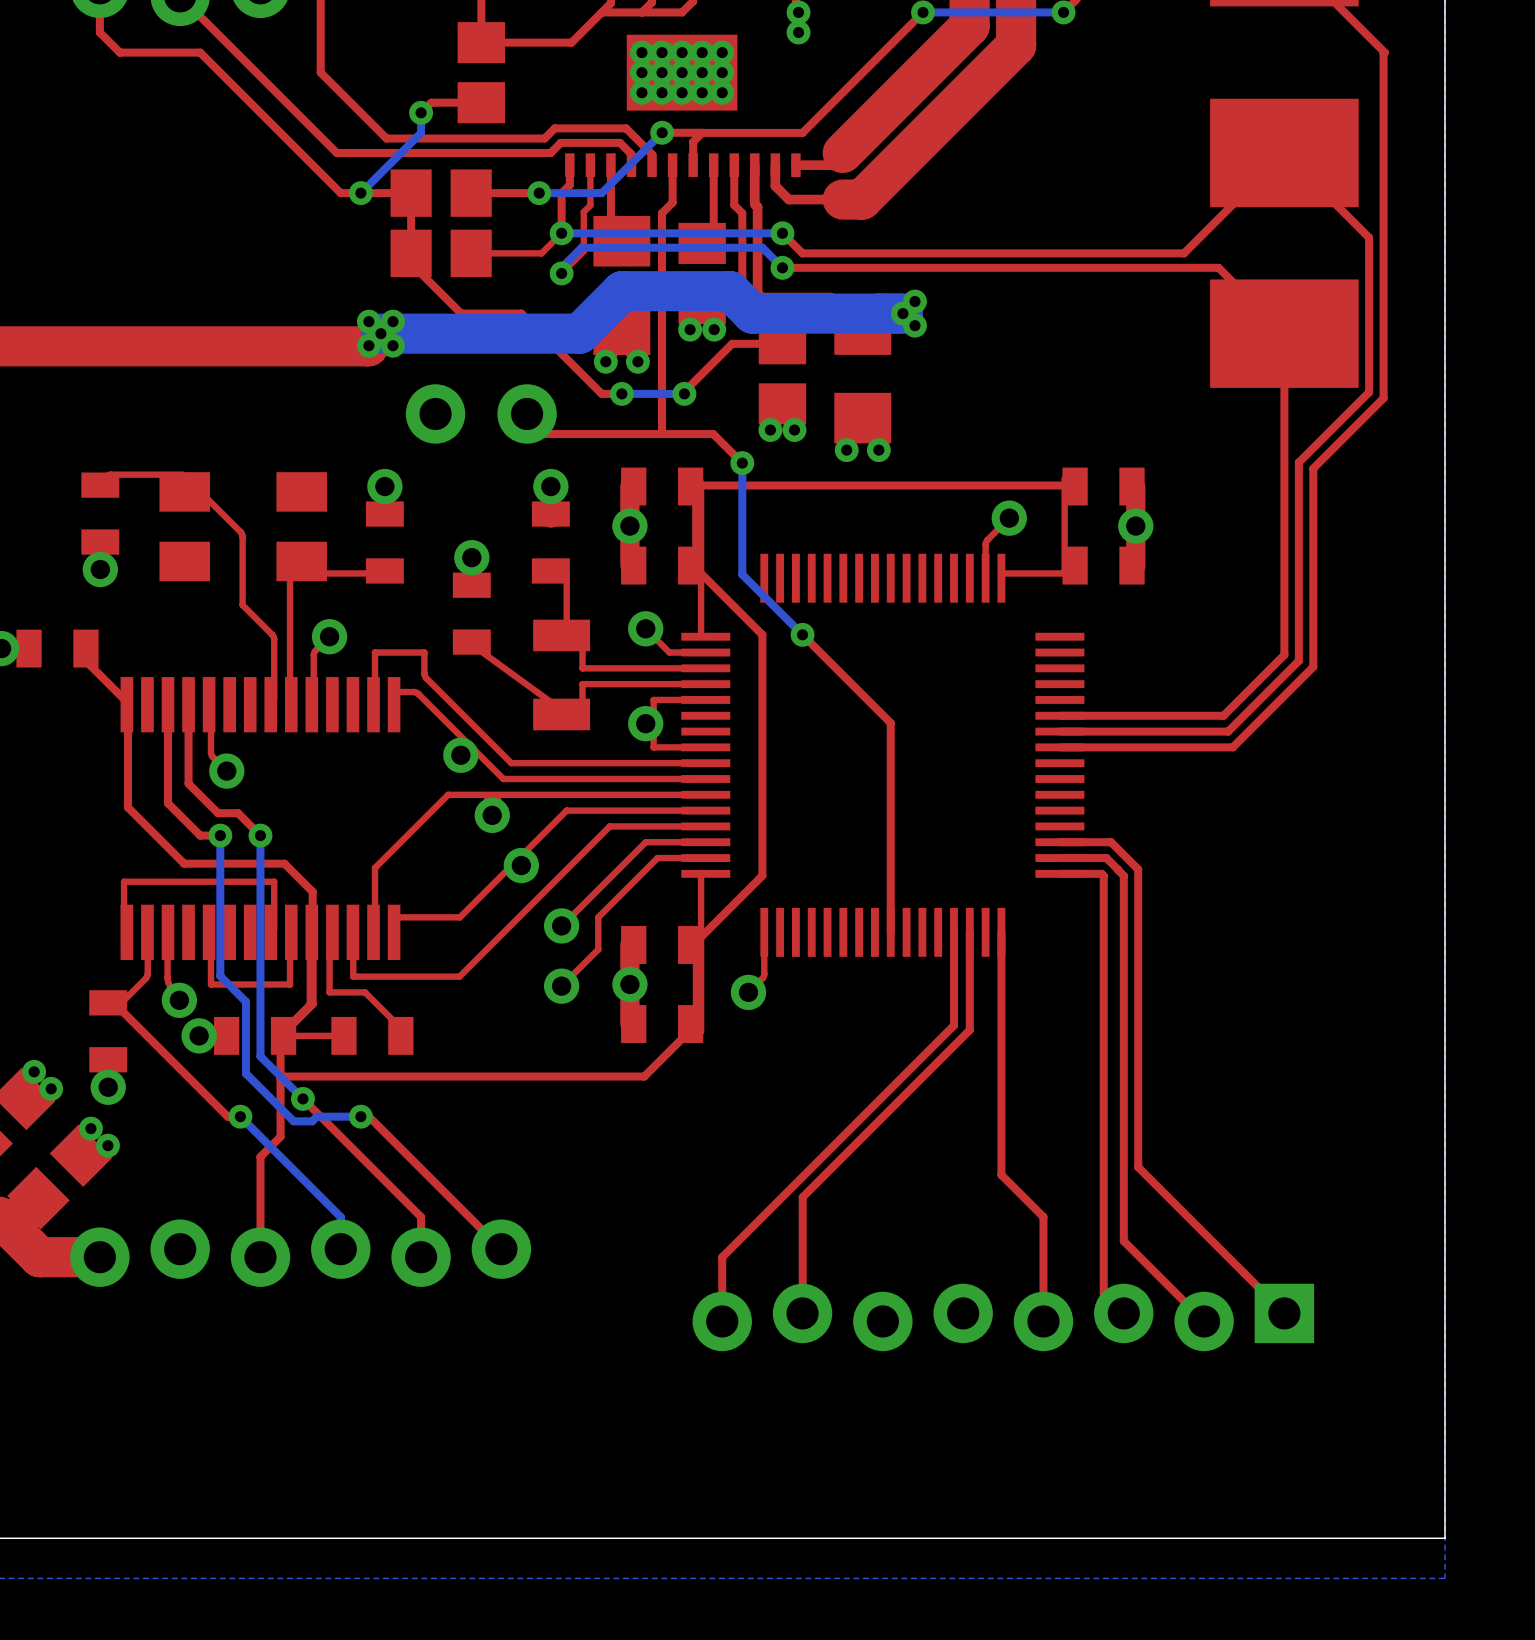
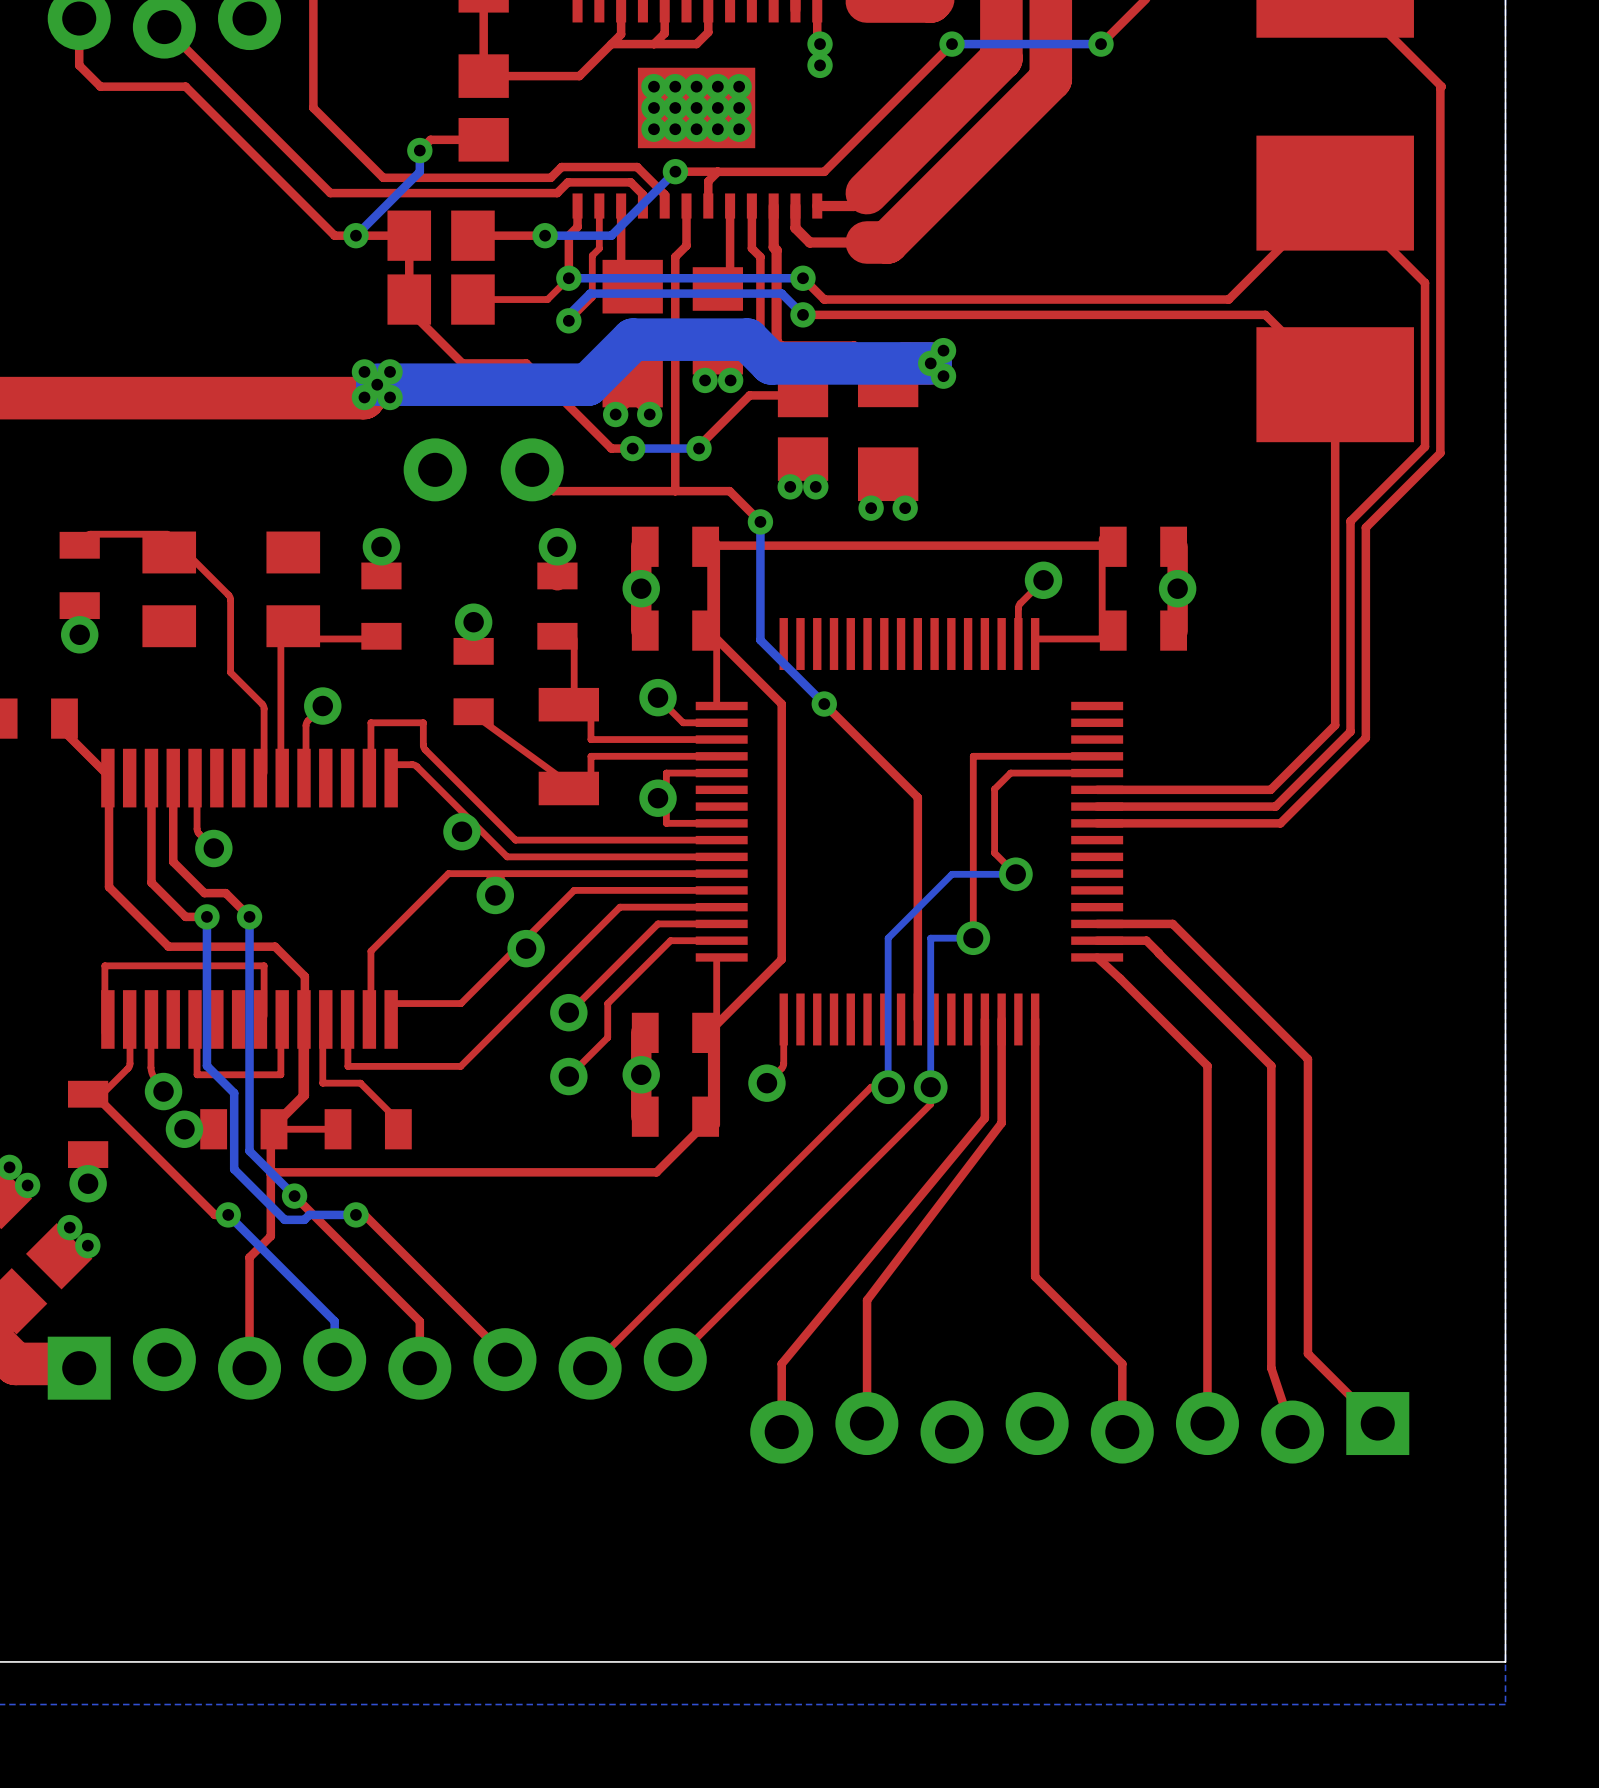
top track: none -> (1097, 756) (973, 756) (973, 938)
top track: none -> (1097, 773) (1010, 773) (994, 789) (994, 853) (1015, 874)
bottom track: none -> (1015, 874) (952, 874) (888, 938) (888, 1087)
via: none -> (1015, 874)
top track: (1111, 842) (1138, 869) (1138, 1167) (1284, 1313) -> (1151, 923) (1172, 923) (1307, 1059) (1307, 1353) (1377, 1423)
bottom track: none -> (973, 938) (930, 938) (930, 1087)
via: none -> (973, 938)
top track: (1059, 873) (1101, 873) (1103, 875) (1103, 1293) (1123, 1313) -> (1097, 957) (1207, 1065) (1207, 1423)
top track: (1123, 875) (1123, 1241) (1204, 1321) -> (1164, 959) (1271, 1065) (1271, 1368) (1292, 1432)
top track: none -> (888, 1087) (871, 1087) (590, 1368)
via: none -> (888, 1087)
top track: none -> (930, 1087) (930, 1104) (675, 1359)
via: none -> (930, 1087)
top track: (954, 1025) (722, 1257) (722, 1321) -> (984, 1118) (781, 1363) (781, 1432)
top track: (969, 1030) (802, 1197) (802, 1313) -> (1001, 1123) (867, 1300) (867, 1423)
top track: (1043, 1217) (1043, 1321) -> (1079, 1321) (1122, 1363) (1122, 1432)
part: (300, 1253) -> none
part: none -> (377, 1363)
part position: (1003, 1317) -> (1079, 1427)

